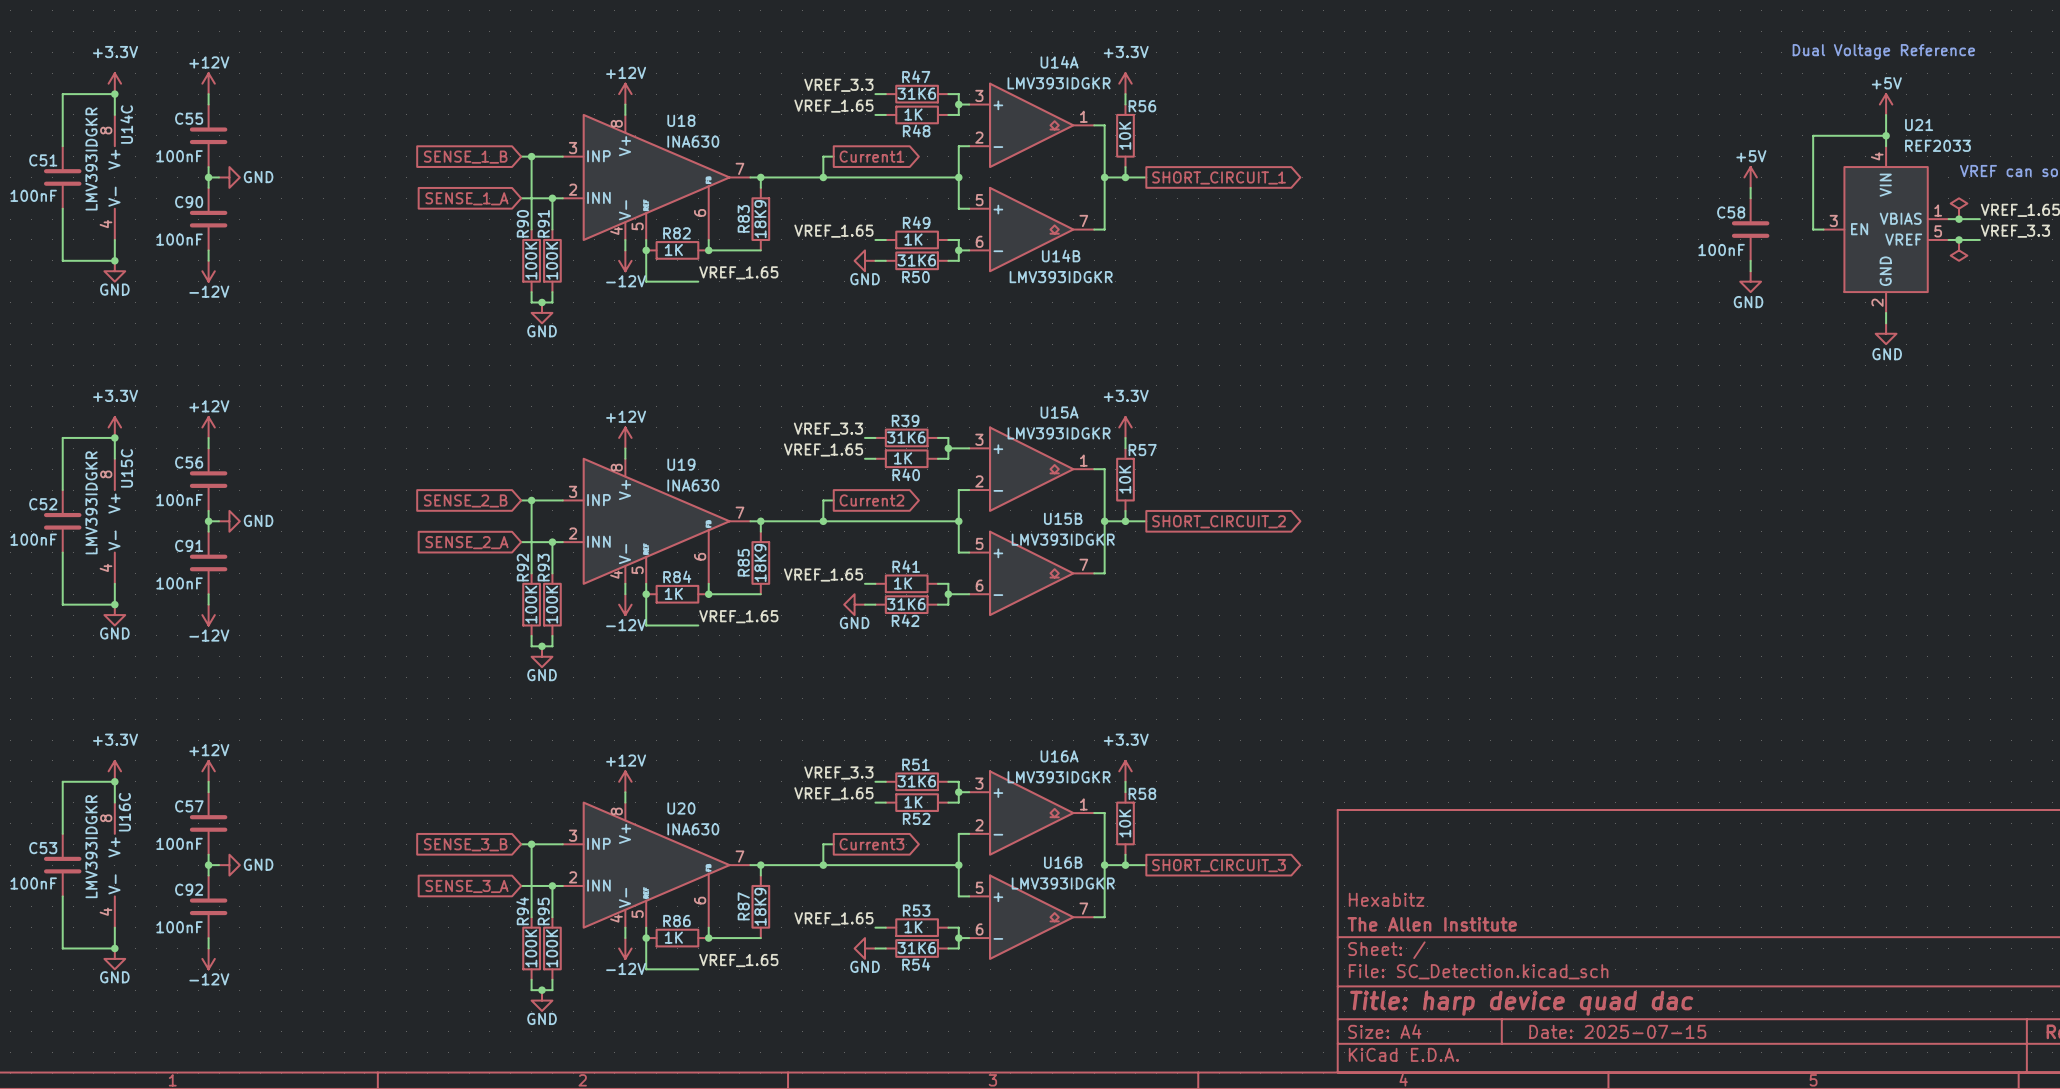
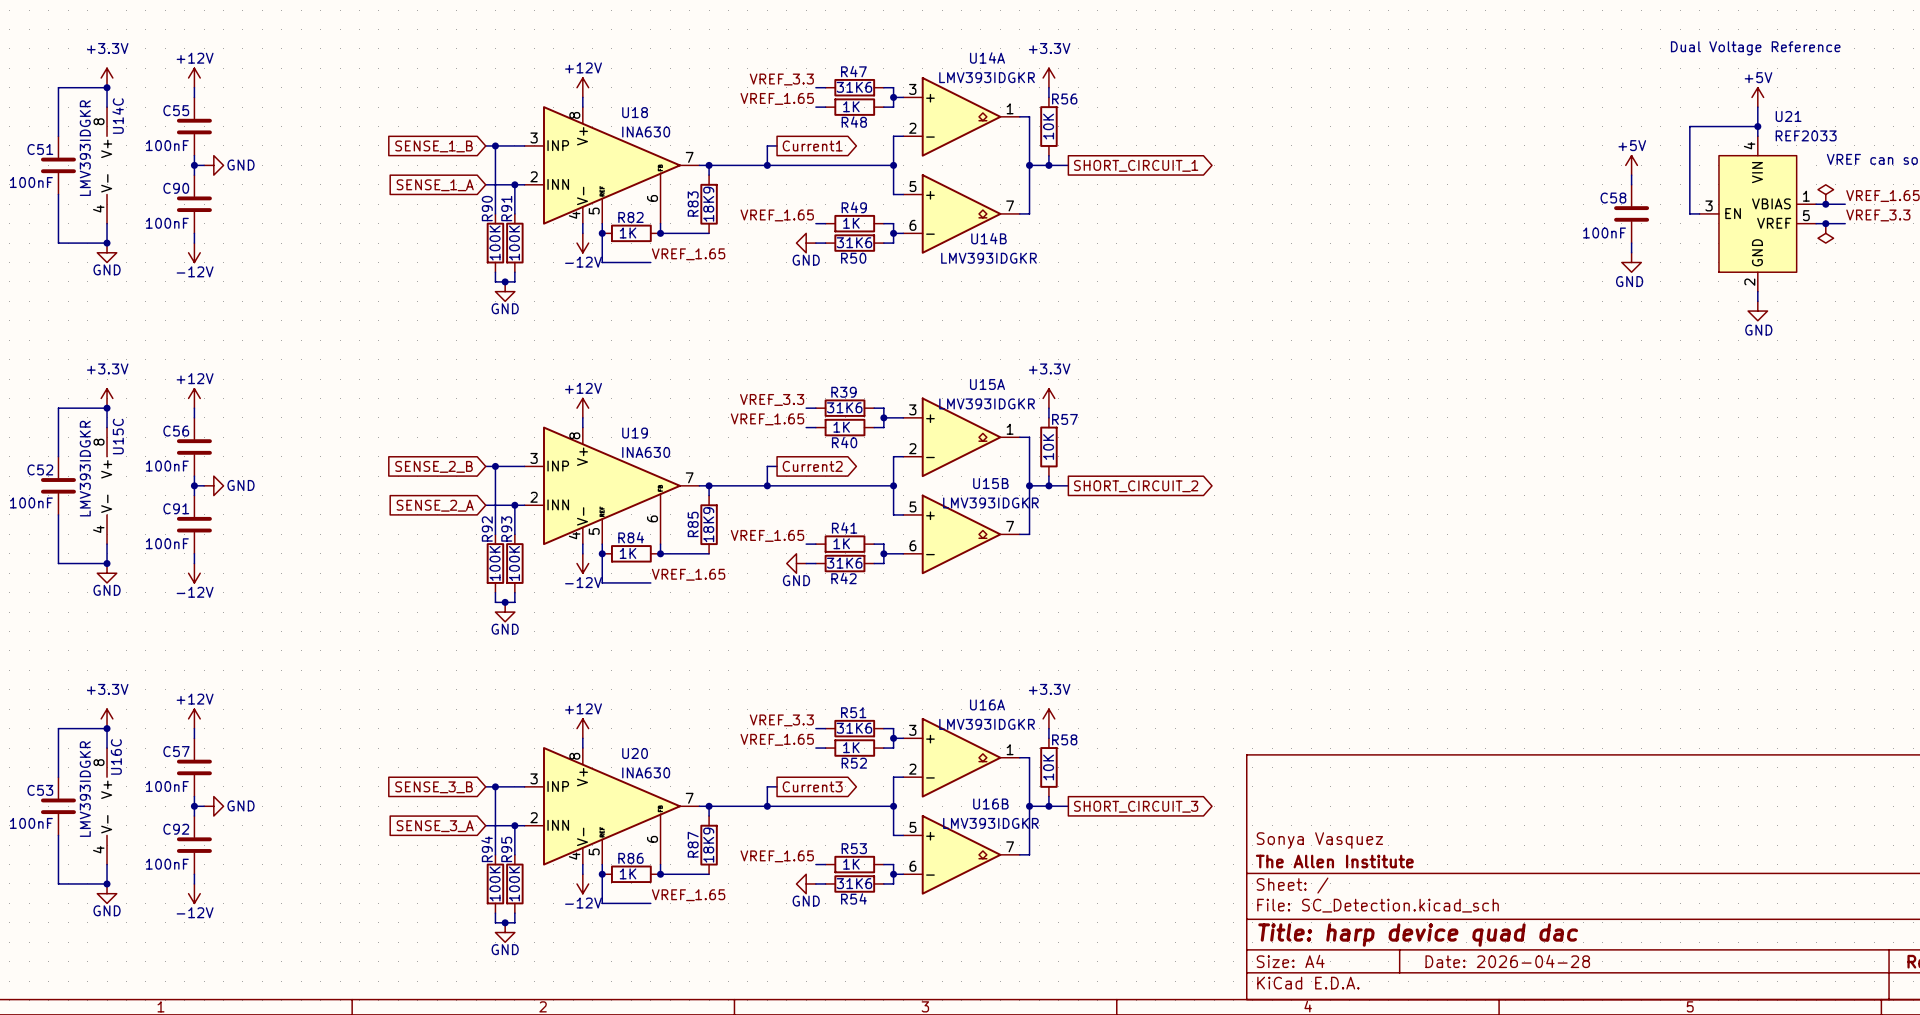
title block: Hexabitz (1386, 899) -> Sonya Vasquez (1319, 840)
title block: Date: 2025-07-15 (1617, 1031) -> Date: 2026-04-28 (1507, 961)

